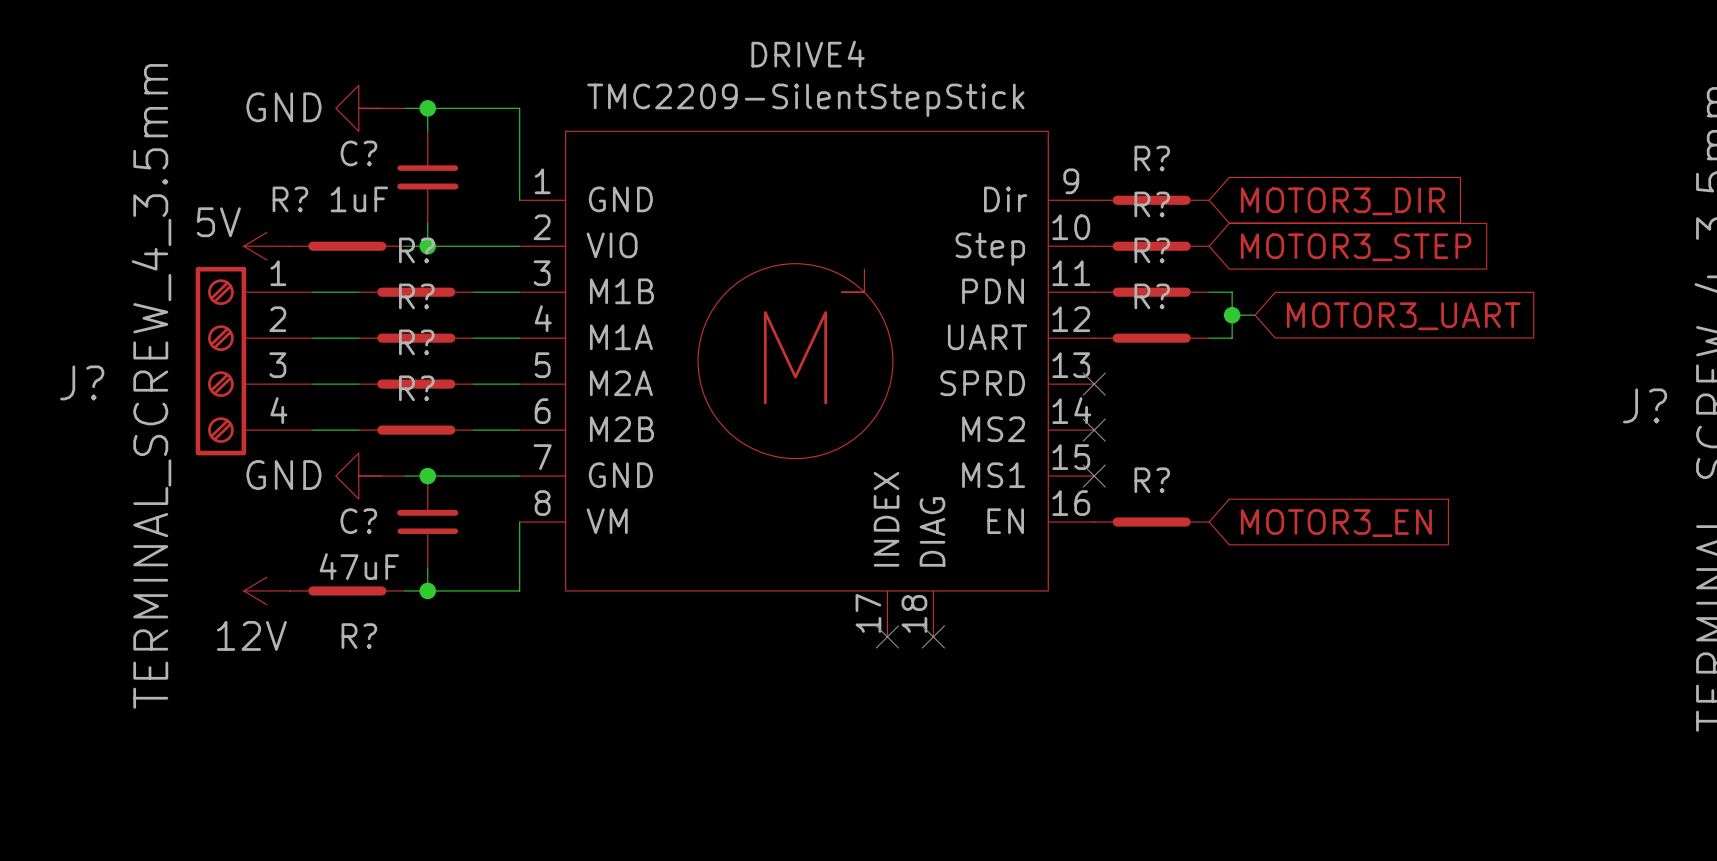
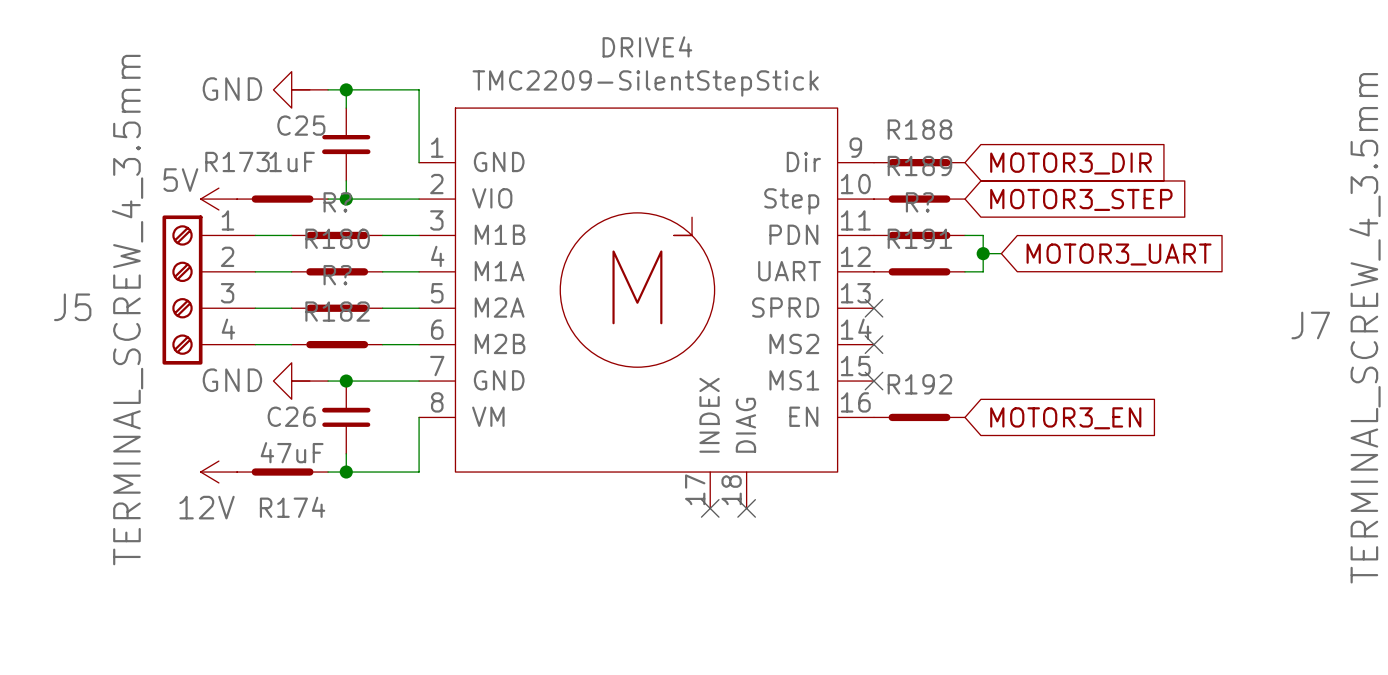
C? name: C? (358, 153) -> C25 (301, 125)
R? name: R? (1152, 158) -> R188 (919, 129)
R? name: R? (290, 199) -> R173 (237, 161)
R? name: R? (1152, 204) -> R189 (919, 165)
R? name: R? (416, 296) -> R180 (337, 238)
R? name: R? (1152, 296) -> R191 (919, 238)
J? name: J? (82, 382) -> J5 (72, 307)
R? name: R? (416, 388) -> R182 (337, 311)
J? name: J? (1645, 405) -> J7 (1310, 325)
R? name: R? (1152, 480) -> R192 (919, 384)
C? name: C? (358, 521) -> C26 (291, 416)
R? name: R? (359, 636) -> R174 (292, 507)

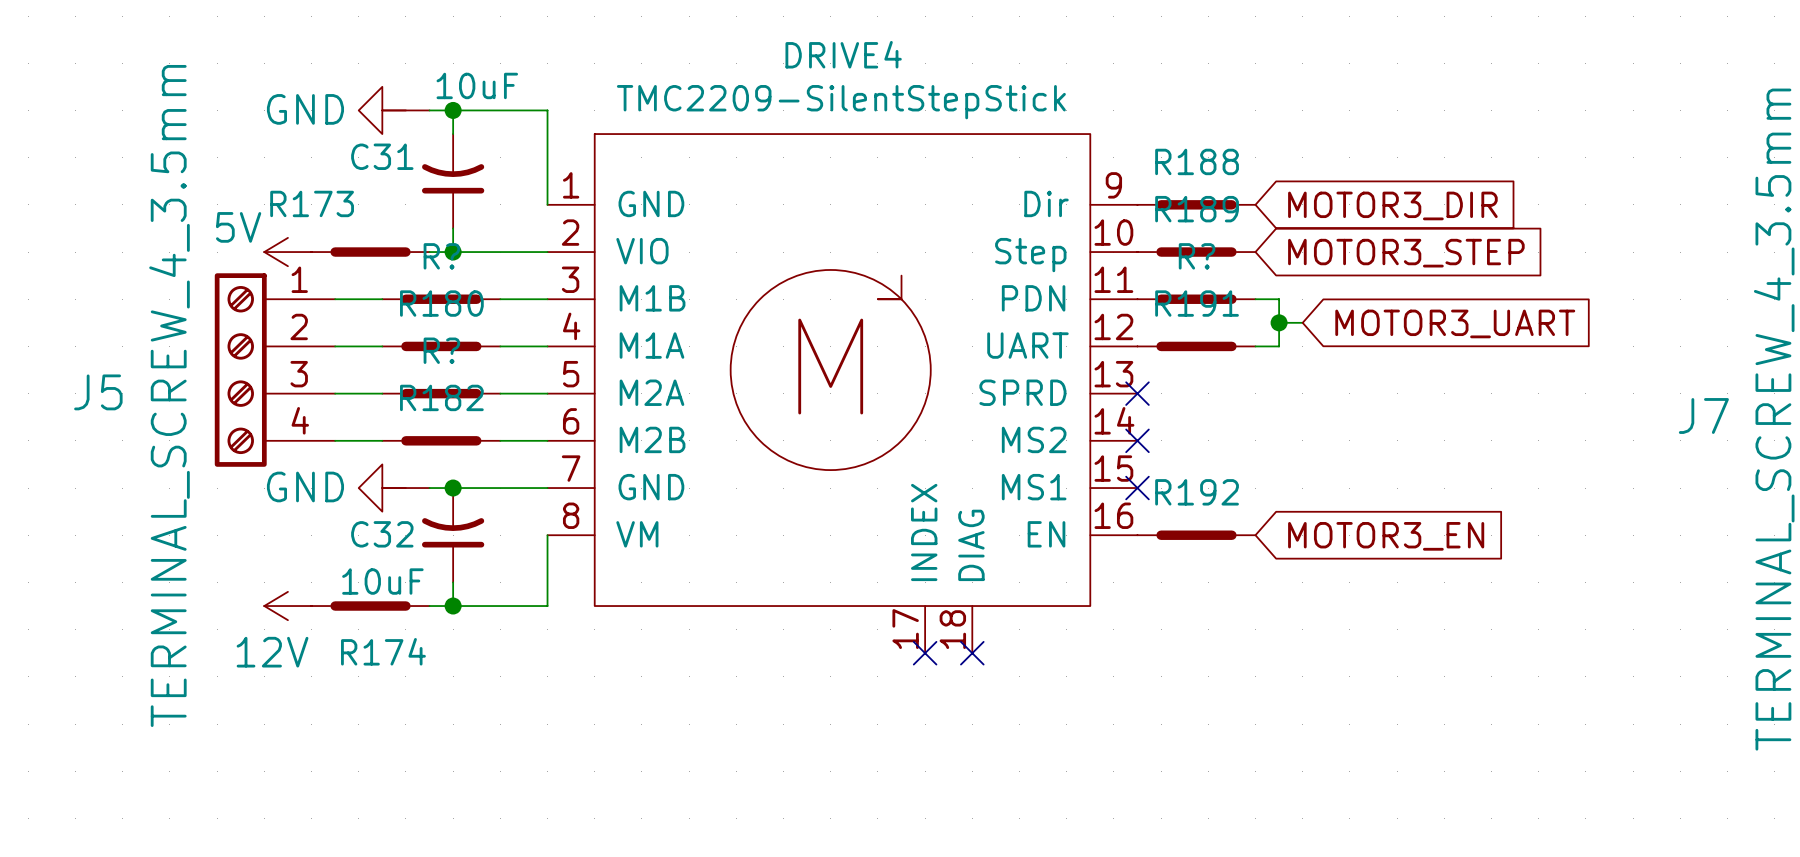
C25: (346, 144) -> none
C31: none -> (453, 181)
C26: (346, 417) -> none
C32: none -> (453, 535)

